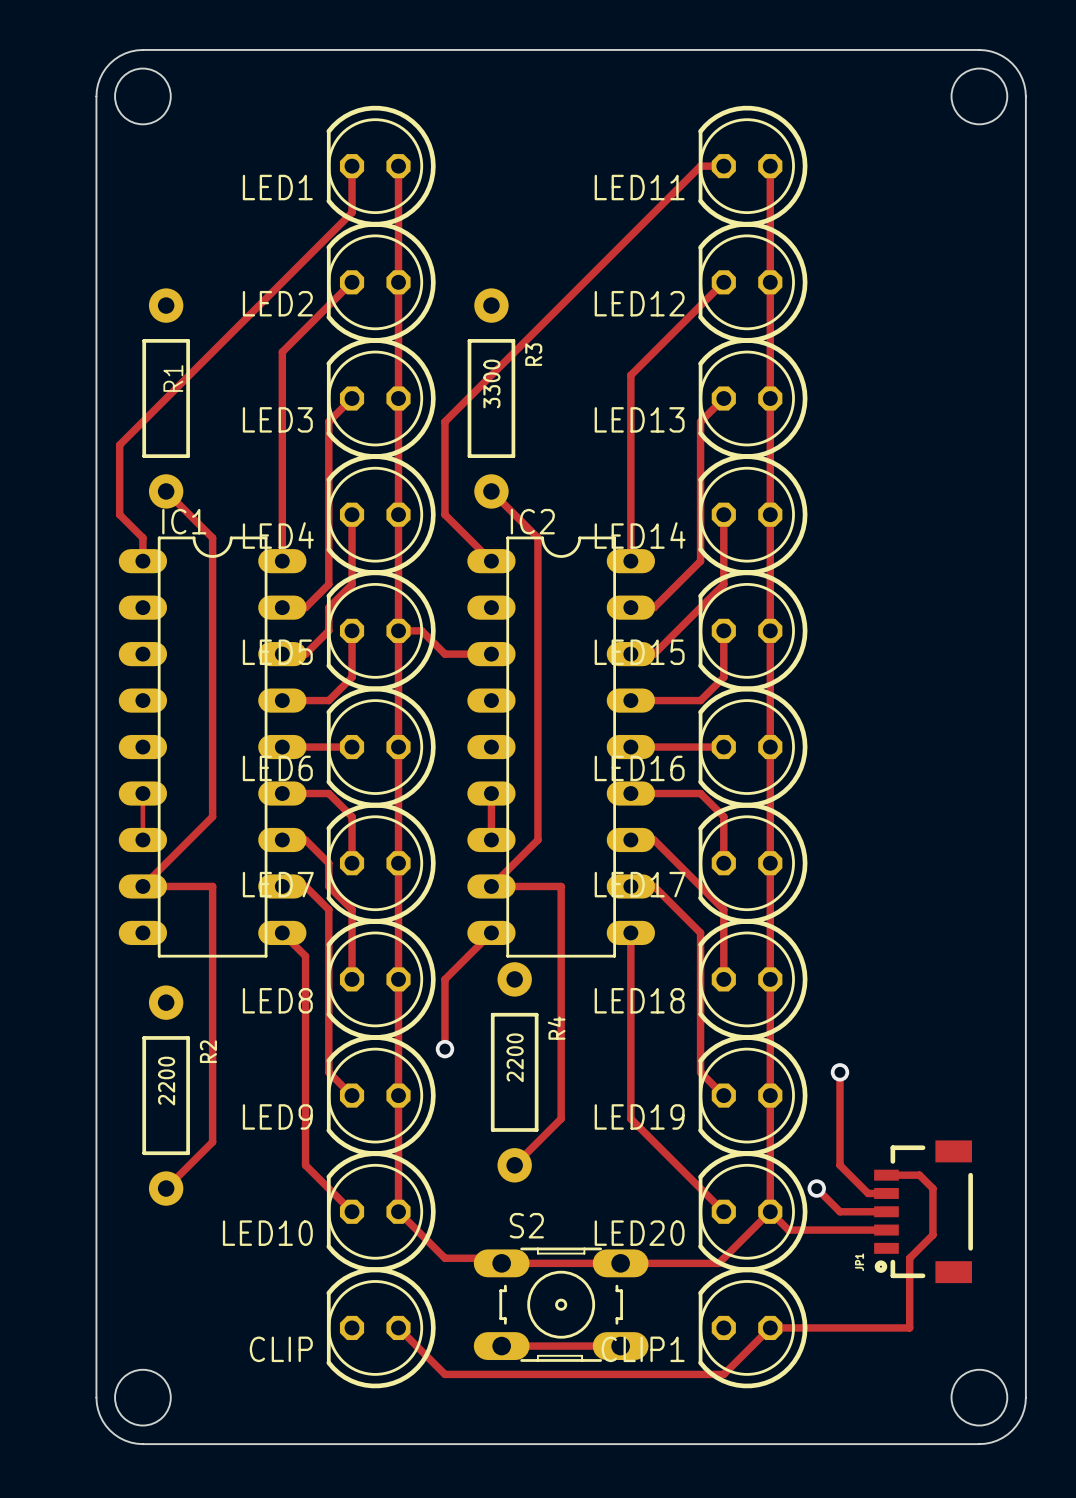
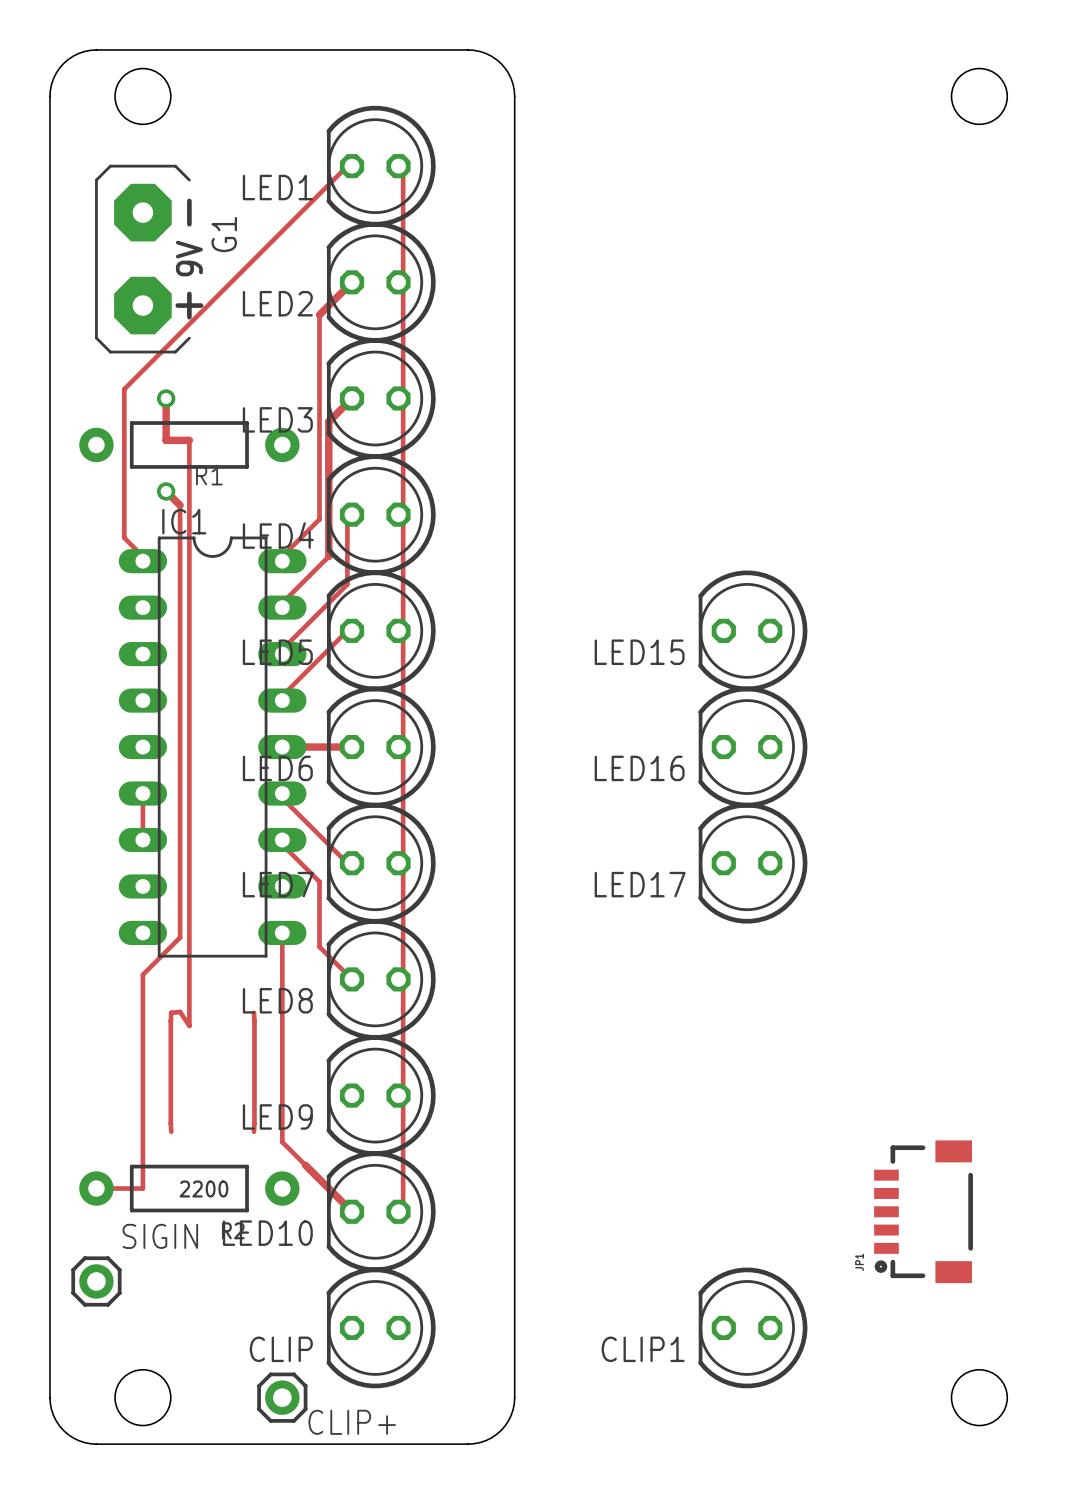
board edge: (142, 49) (125, 53) (110, 63) (99, 78) (96, 96) (96, 1397) (99, 1415) (110, 1430) (125, 1440) (142, 1444) -> (142, 49) (90, 50) (73, 56) (63, 63) (56, 73) (51, 84) (49, 96) (50, 1403) (53, 1415) (59, 1425) (68, 1434) (78, 1440) (96, 1444) (142, 1444)
board edge: (468, 49) (985, 50) (997, 53) (1012, 63) (1022, 78) (1025, 96) (1025, 1397) (1022, 1415) (1016, 1425) (1007, 1434) (991, 1442) (979, 1444) (468, 1444) -> (468, 49) (486, 53) (501, 63) (511, 78) (514, 96) (514, 1397) (511, 1415) (501, 1430) (486, 1440) (468, 1444)
track: (352, 166) (352, 212) (119, 444) (119, 514) (142, 537) (142, 556) -> (352, 166) (347, 166) (124, 389) (124, 537) (142, 556)
track: (398, 166) (398, 1211) (444, 1258) (496, 1258) (501, 1263) (718, 1263) (770, 1211) -> (398, 166) (403, 166) (403, 277) (398, 282) (403, 286) (403, 510) (398, 514) (403, 519) (403, 742) (398, 747) (403, 751) (403, 974) (398, 979) (403, 984) (403, 1207) (398, 1211)
track: (723, 166) (700, 166) (444, 421) (444, 514) (491, 561) -> none
LED11: (752, 166) -> none
track: (770, 166) (770, 1211) -> none
G1: none -> (149, 259)
track: (723, 282) (630, 375) (630, 561) -> none
LED12: (752, 282) -> none
track: (319, 314) (282, 352) (282, 556) -> (319, 314) (319, 519) (282, 556)
track: none -> (166, 398) (166, 440) (189, 440) (189, 1025) (180, 1011) (171, 1012) (171, 1131)
R1 rotation: 0° (166, 398) -> 90° clockwise (189, 444)
via: none -> (166, 398)
R3: 3300 (491, 398) -> none
track: (723, 398) (700, 421) (700, 561) (654, 607) (630, 607) -> none
LED13: (752, 398) -> none
track: (491, 491) (537, 537) (537, 839) (491, 886) (561, 886) (561, 1118) (514, 1165) -> none
track: (180, 505) (212, 537) (212, 816) (142, 886) (212, 886) (212, 1142) (166, 1188) -> (180, 505) (180, 937) (142, 974) (142, 1188) (96, 1188)
track: (352, 514) (352, 584) (328, 607) (328, 630) (305, 654) (282, 654) -> (352, 514) (347, 519) (347, 584) (282, 649) (282, 654)
track: (723, 514) (723, 584) (654, 654) (630, 654) -> none
LED14: (752, 514) -> none
track: (328, 556) (328, 584) (305, 607) (282, 607) -> (328, 556) (282, 602) (282, 607)
track: (352, 630) (352, 677) (328, 700) (282, 700) -> (352, 630) (347, 630) (282, 695) (282, 700)
track: (403, 630) (421, 630) (444, 654) (491, 654) -> none
track: (723, 630) (723, 677) (700, 700) (630, 700) -> none
IC2: (561, 747) -> none
track: (630, 747) (723, 747) -> none
track: (282, 793) (328, 793) (352, 816) (352, 863) -> (282, 793) (282, 798) (347, 863) (352, 863)
track: (491, 793) (491, 839) -> none
track: (630, 793) (700, 793) (723, 816) (723, 863) -> none
track: (282, 839) (305, 839) (328, 863) (328, 886) (352, 909) (352, 979) -> (282, 839) (282, 844) (319, 881) (319, 946) (352, 979)
track: (630, 839) (654, 839) (723, 909) (723, 979) -> none
track: (282, 886) (305, 886) (328, 909) (328, 1072) (352, 1095) -> none
track: (630, 886) (654, 886) (700, 932) (700, 1072) (723, 1095) -> none
track: (282, 932) (305, 956) (305, 1165) -> (282, 932) (282, 1142) (305, 1165)
track: (491, 932) (444, 979) (444, 1049) -> none
track: (630, 932) (630, 1118) (723, 1211) -> none
LED18: (752, 979) -> none
track: none -> (253, 1012) (253, 1131)
via: (444, 1049) -> none
R4: 2200 (514, 1072) -> none
track: (839, 1072) (839, 1165) (868, 1193) (886, 1193) -> none
via: (839, 1072) -> none
R2 rotation: 0° (166, 1095) -> 90° clockwise (189, 1188)
LED19: (752, 1095) -> none
track: (886, 1175) (919, 1175) (932, 1188) (932, 1235) (909, 1258) (909, 1327) (770, 1327) (723, 1374) (444, 1374) (398, 1327) -> none
track: (816, 1188) (839, 1211) (886, 1211) -> none
via: (816, 1188) -> none
LED20: (752, 1211) -> none
track: (770, 1211) (788, 1230) (886, 1230) -> none
SIGIN: none -> (96, 1281)
S2: (561, 1304) -> none
track: (501, 1346) (620, 1346) -> none
CLIP+: none -> (282, 1397)

